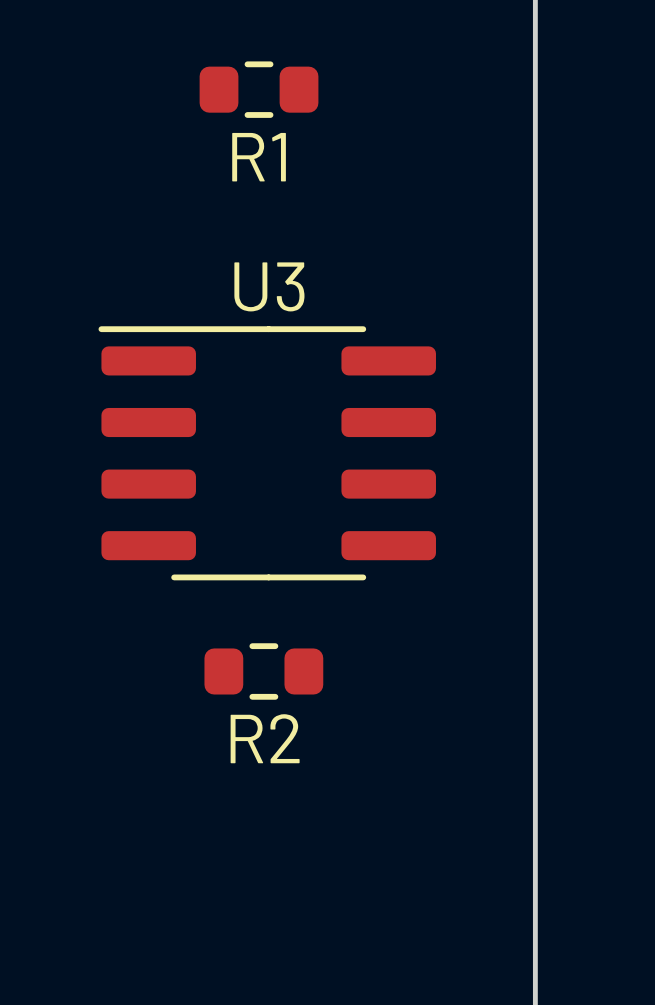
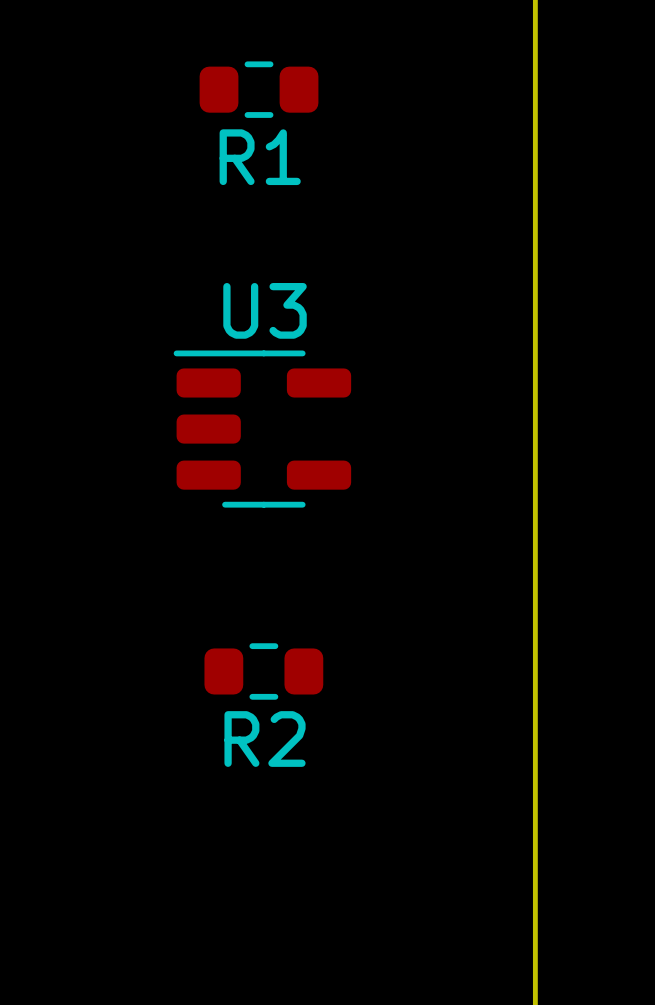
U3 footprint: [98, 326, 436, 581] -> [173, 350, 352, 508]

